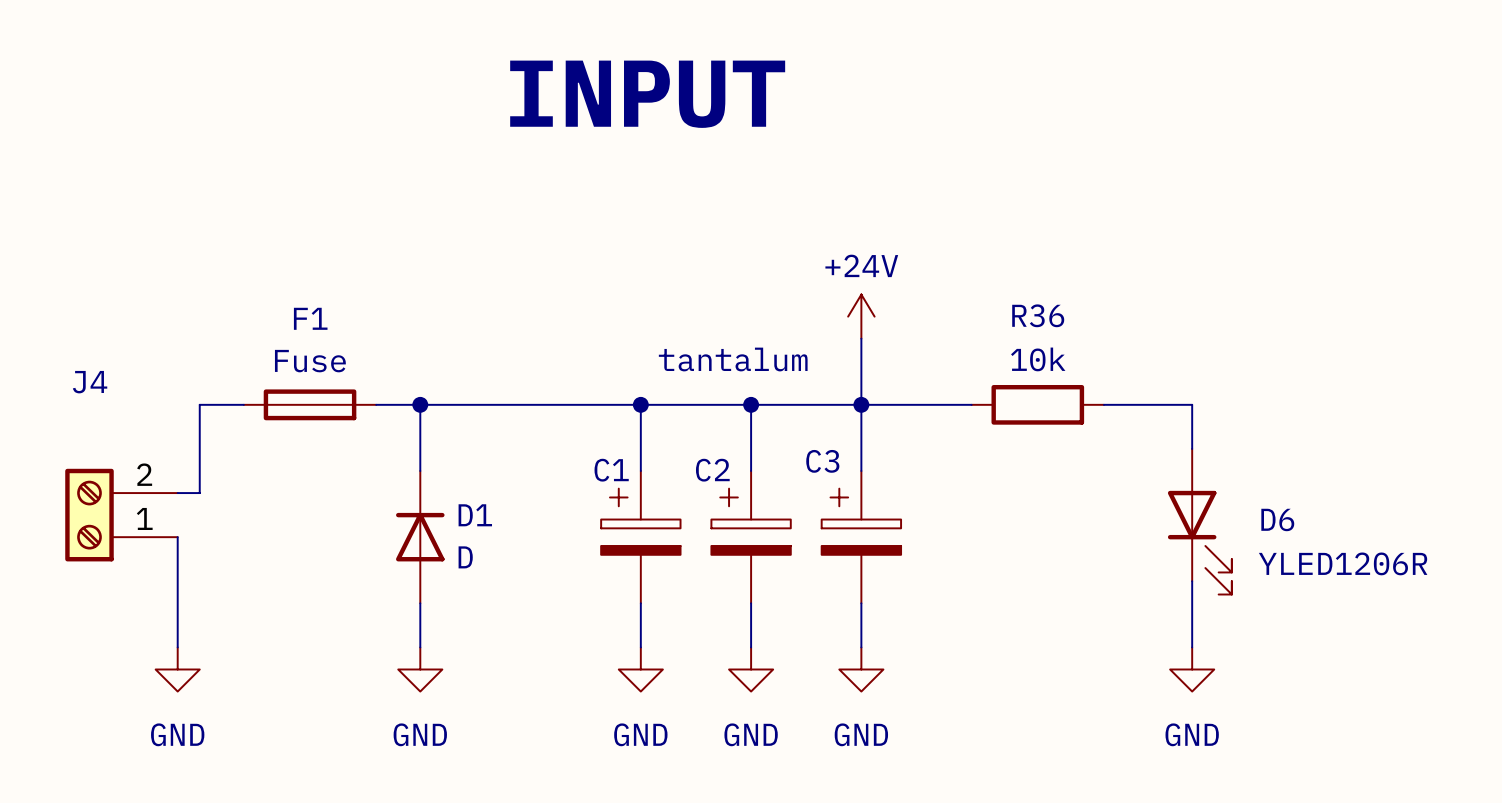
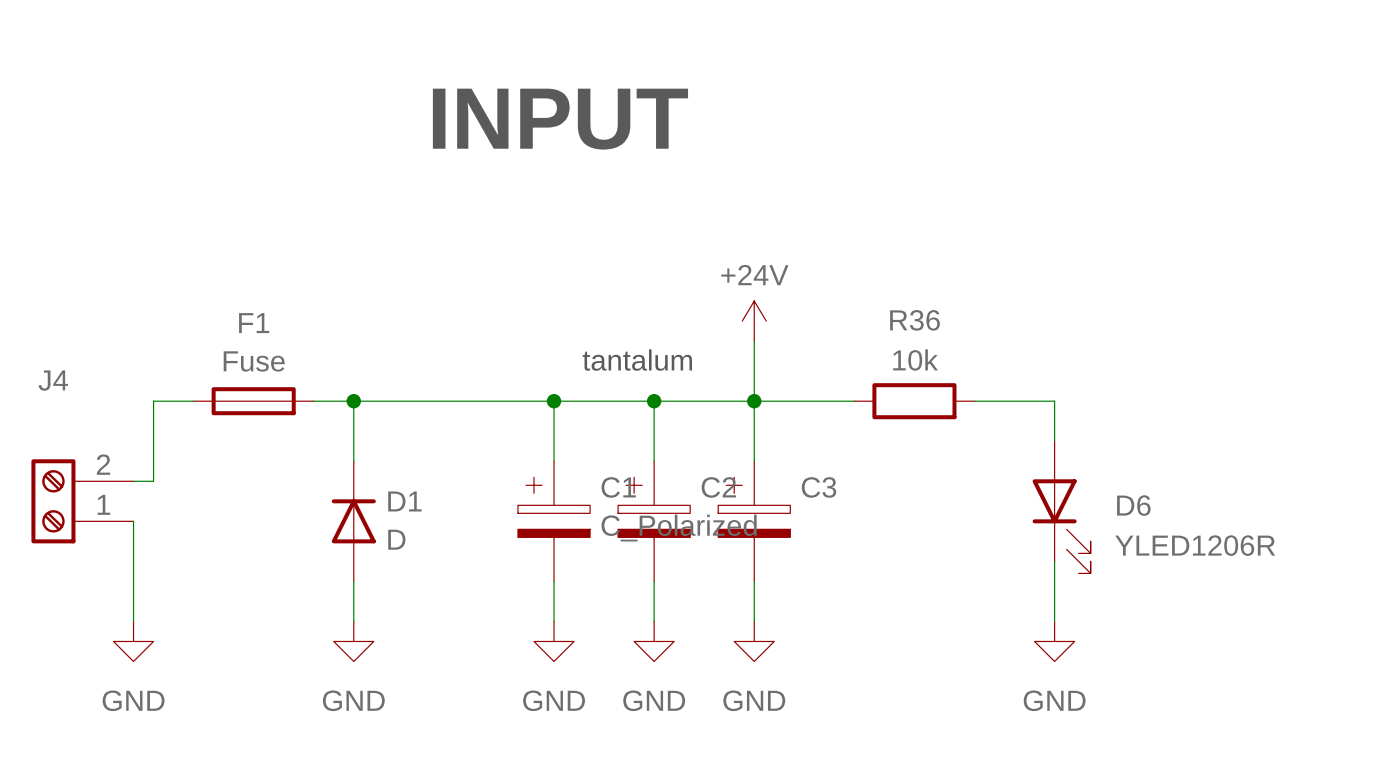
C3 name position: C3 (822, 461) -> C3 (819, 487)
C1 name position: C1 (611, 470) -> C1 (618, 487)
C2 name position: C2 (712, 470) -> C2 (718, 487)
C1 value: none -> C_Polarized (679, 528)

